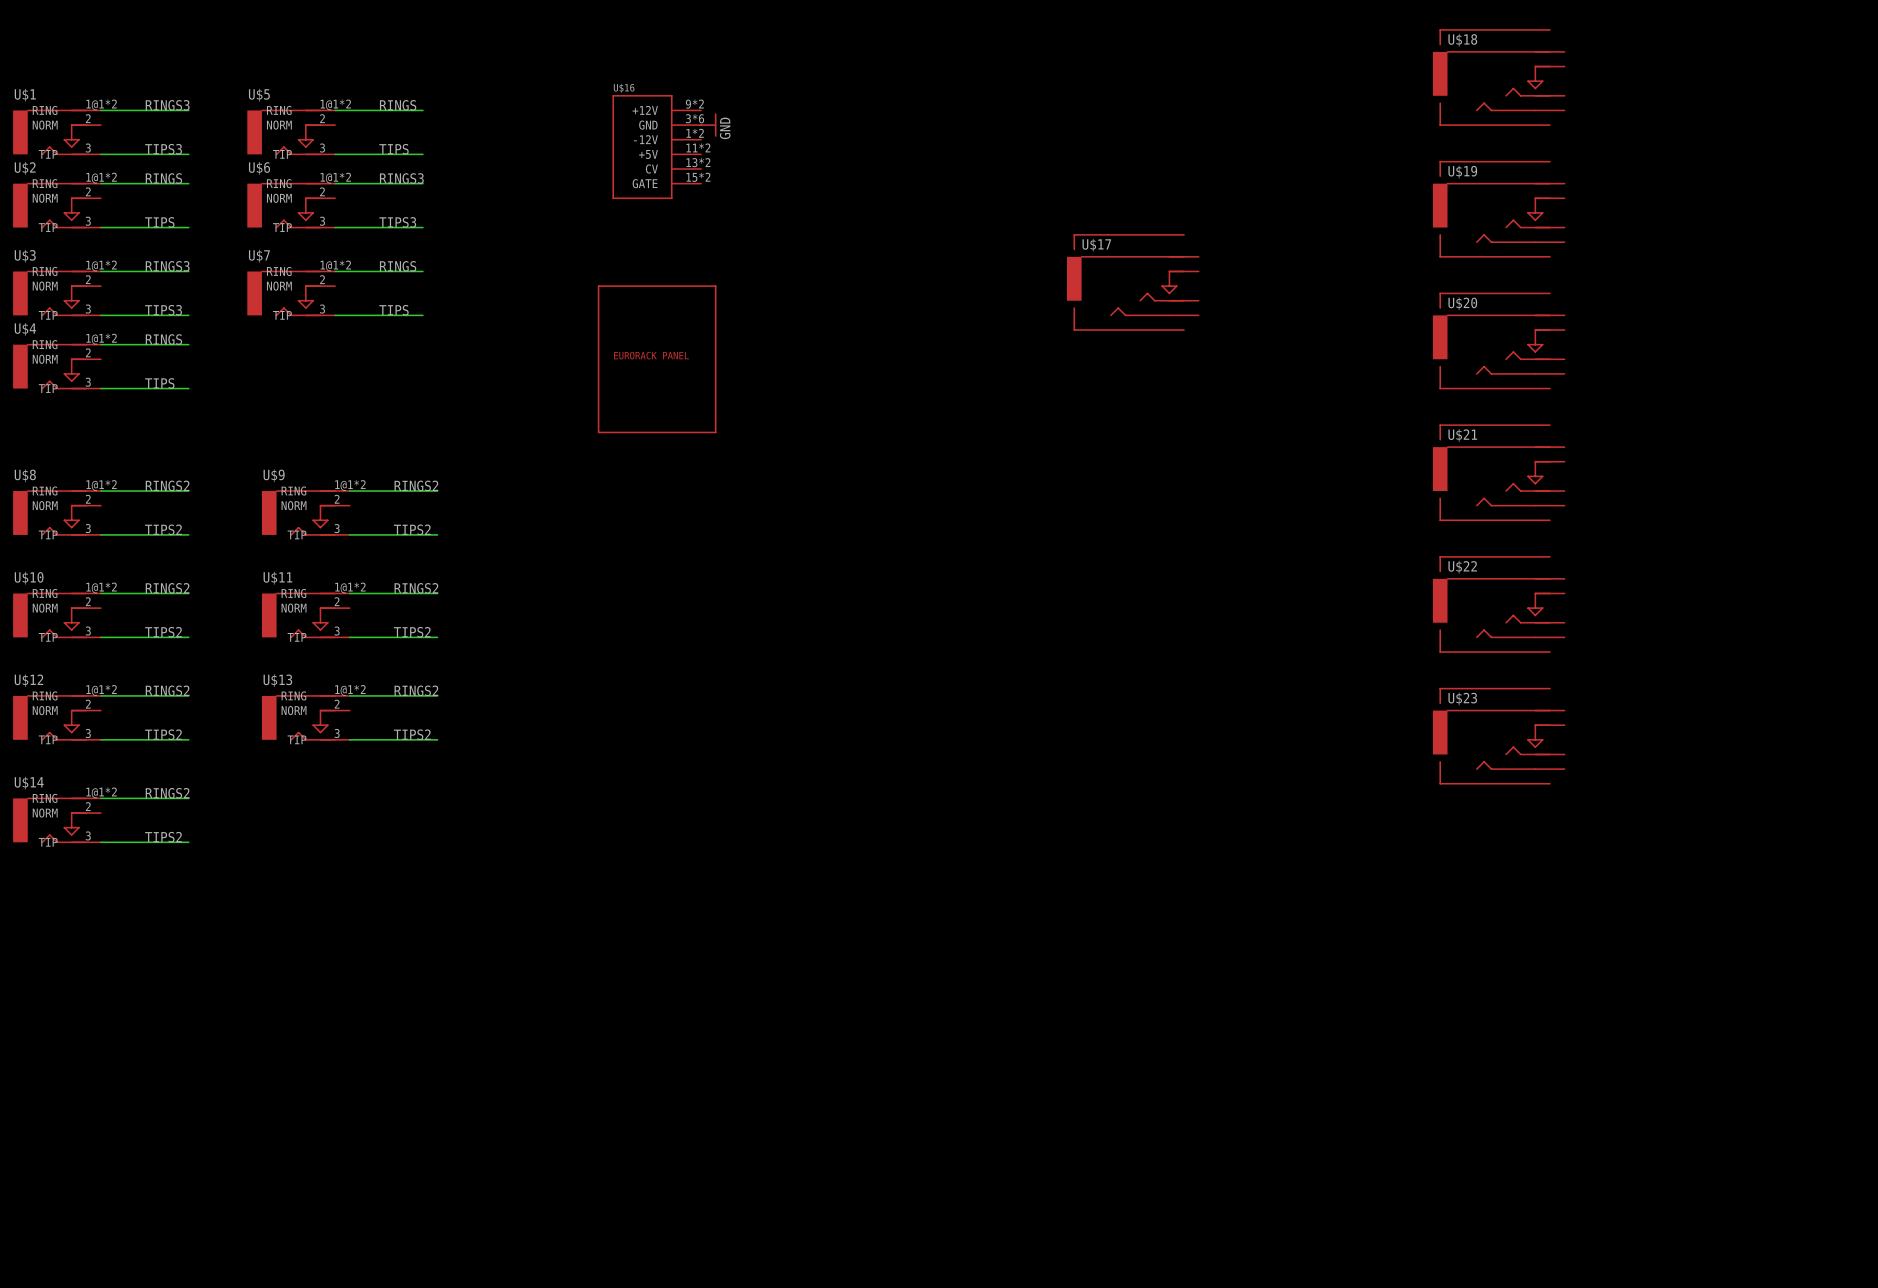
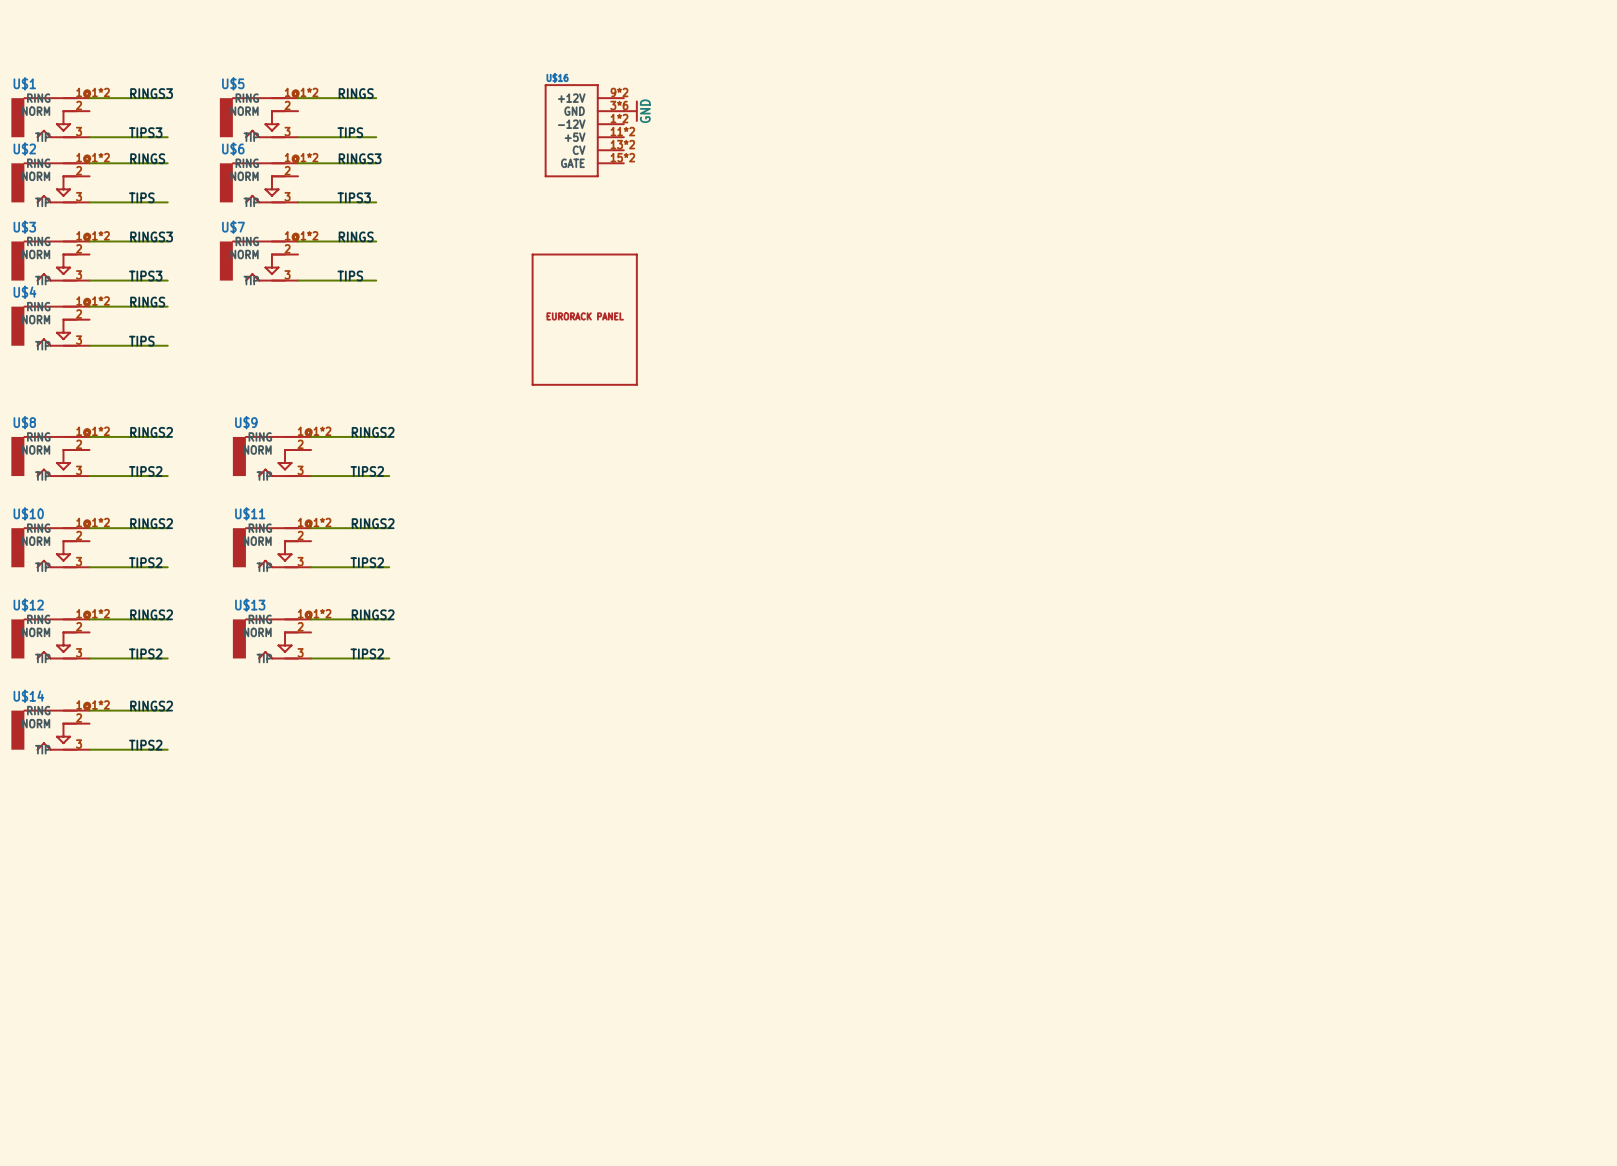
U$18: (1498, 77) -> none
U$19: (1498, 209) -> none
U$17: (1132, 282) -> none
U$20: (1498, 340) -> none
U$21: (1498, 472) -> none
U$22: (1498, 604) -> none
U$23: (1498, 736) -> none

